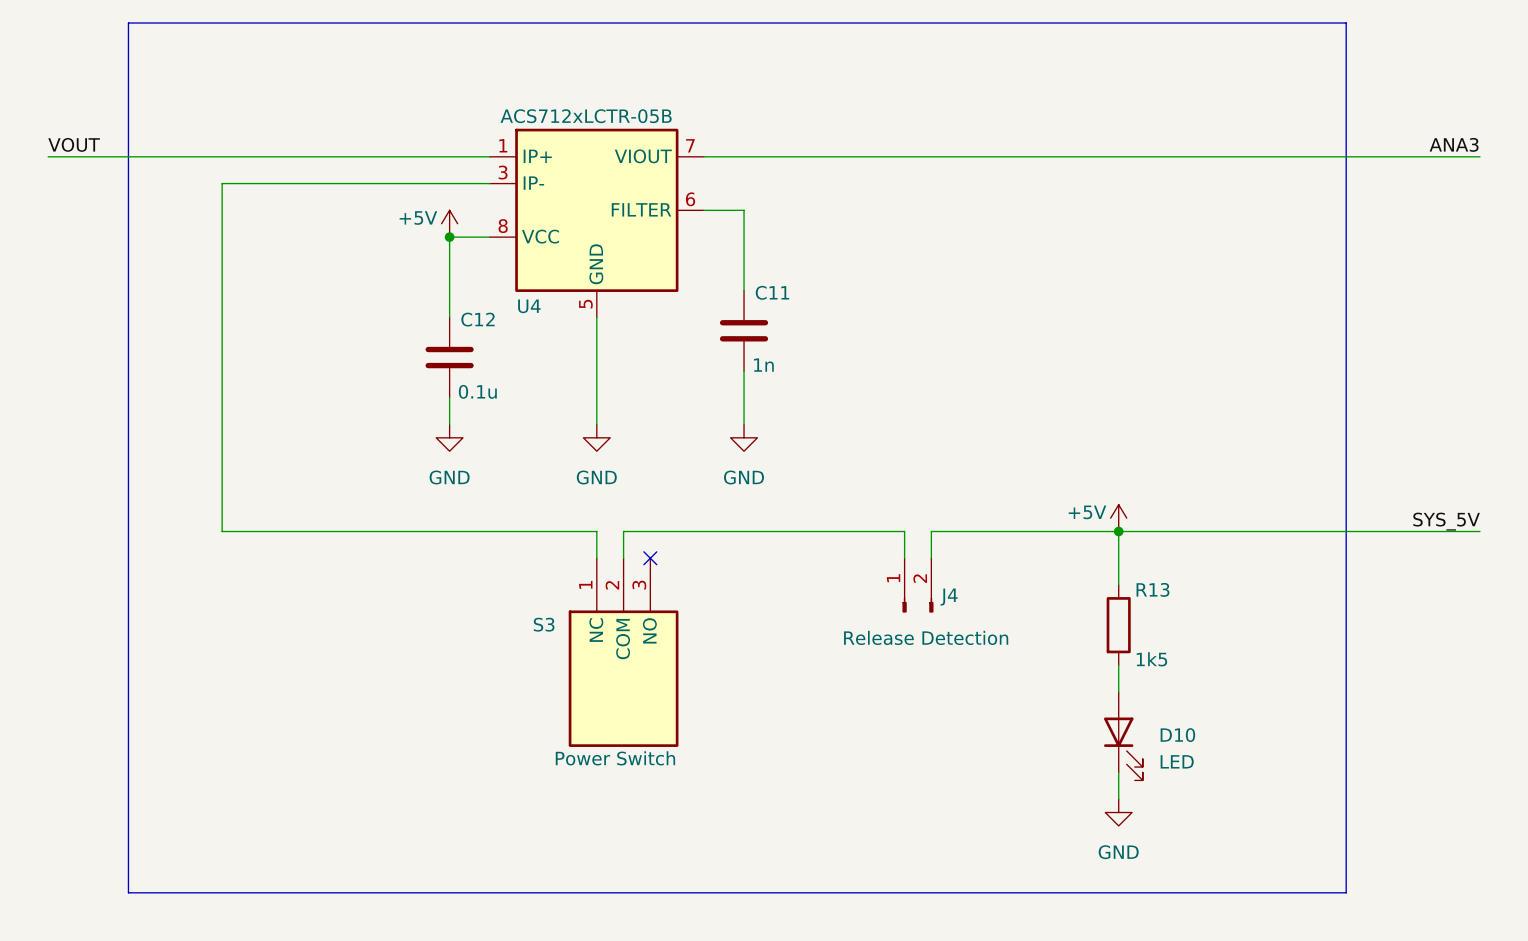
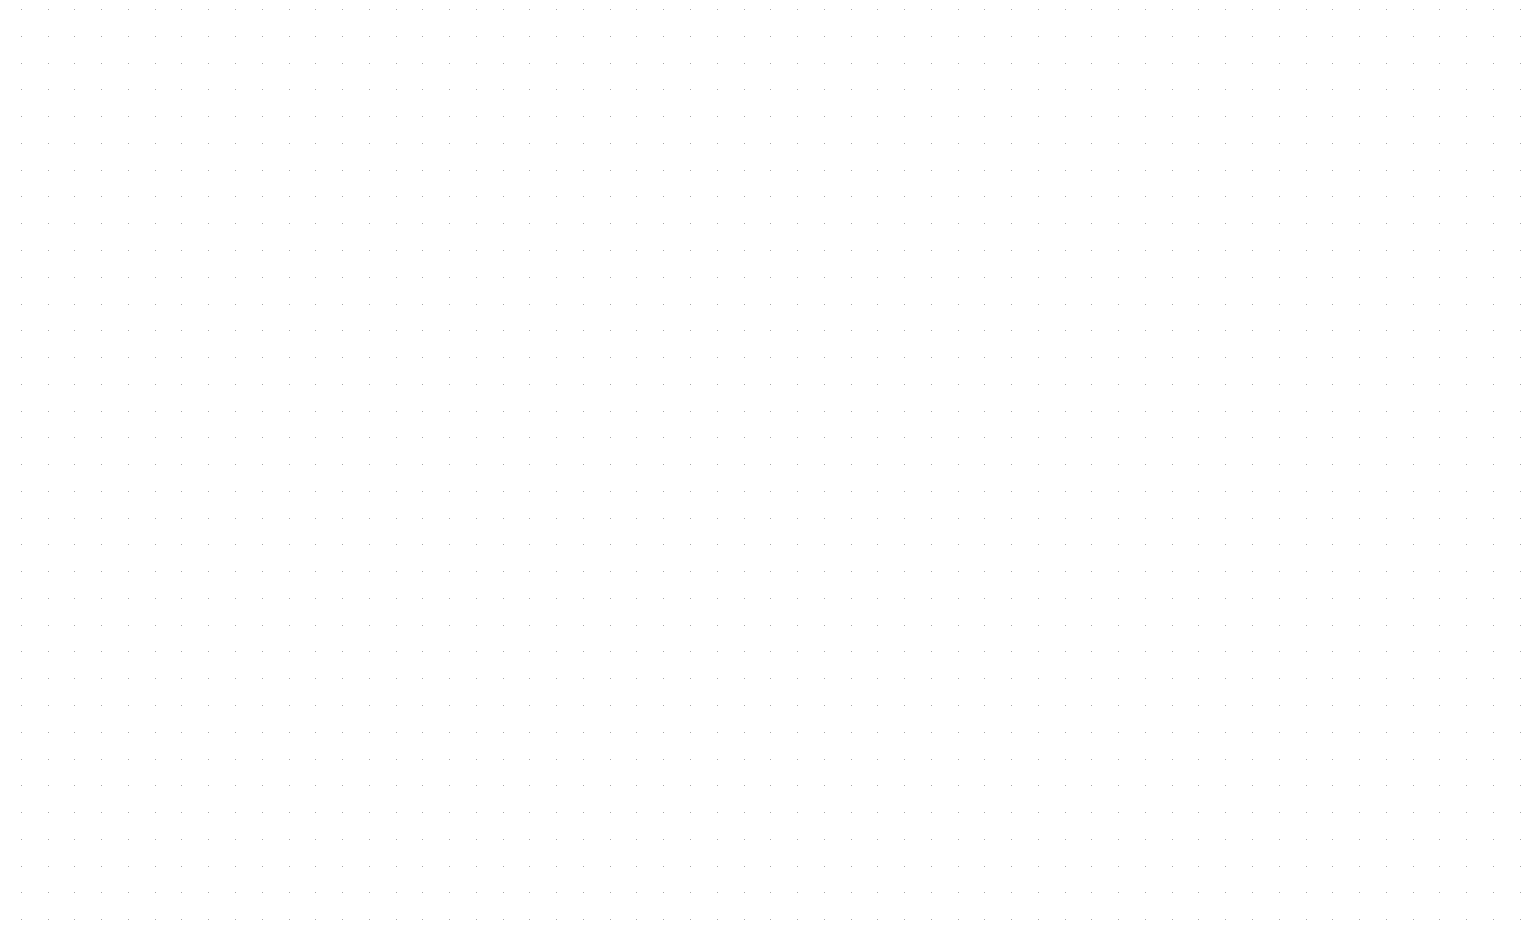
line: (128, 23) (1346, 23) (1346, 892) (128, 892) (128, 23) -> none
label: VOUT (74, 144) -> none
label: ANA3 (1454, 144) -> none
wire: (48, 156) (489, 156) -> none
wire: (703, 156) (1480, 156) -> none
wire: (489, 183) (222, 183) (222, 531) (596, 531) (596, 558) -> none
wire: (703, 210) (744, 210) (744, 290) -> none
power symbol: +5V (449, 223) -> none
U4: ACS712xLCTR-05B (596, 223) -> none
junction: (449, 237) -> none
wire: (489, 237) (449, 237) (449, 317) -> none
wire: (596, 317) (596, 424) -> none
C11: 1n (744, 330) -> none
C12: 0.1u (449, 357) -> none
wire: (744, 370) (744, 424) -> none
wire: (449, 397) (449, 424) -> none
power symbol: GND (449, 437) -> none
power symbol: GND (596, 437) -> none
power symbol: GND (744, 437) -> none
power symbol: +5V (1118, 518) -> none
label: SYS_5V (1446, 521) -> none
wire: (1118, 531) (1118, 585) -> none
junction: (1118, 531) -> none
wire: (1480, 531) (931, 531) (931, 558) -> none
wire: (623, 558) (623, 531) (904, 531) (904, 558) -> none
no-connect mark: (650, 558) -> none
J4: Release Detection (917, 585) -> none
R13: 1k5 (1118, 625) -> none
S3: Power Switch (623, 652) -> none
wire: (1118, 665) (1118, 692) -> none
D10: LED (1123, 736) -> none
wire: (1118, 772) (1118, 799) -> none
power symbol: GND (1118, 812) -> none

